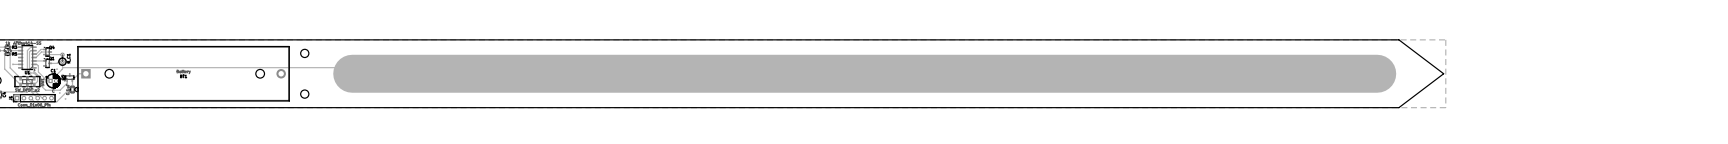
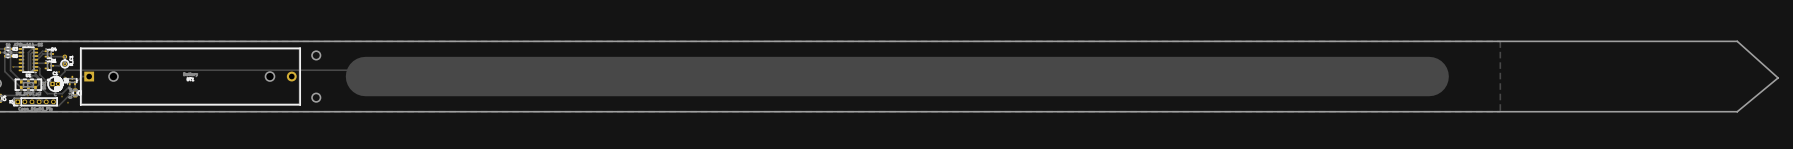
board edge: (1398, 39) (1443, 73) (1398, 107) -> (1451, 41) (1737, 41) (1778, 77) (1737, 111) (1451, 111)

